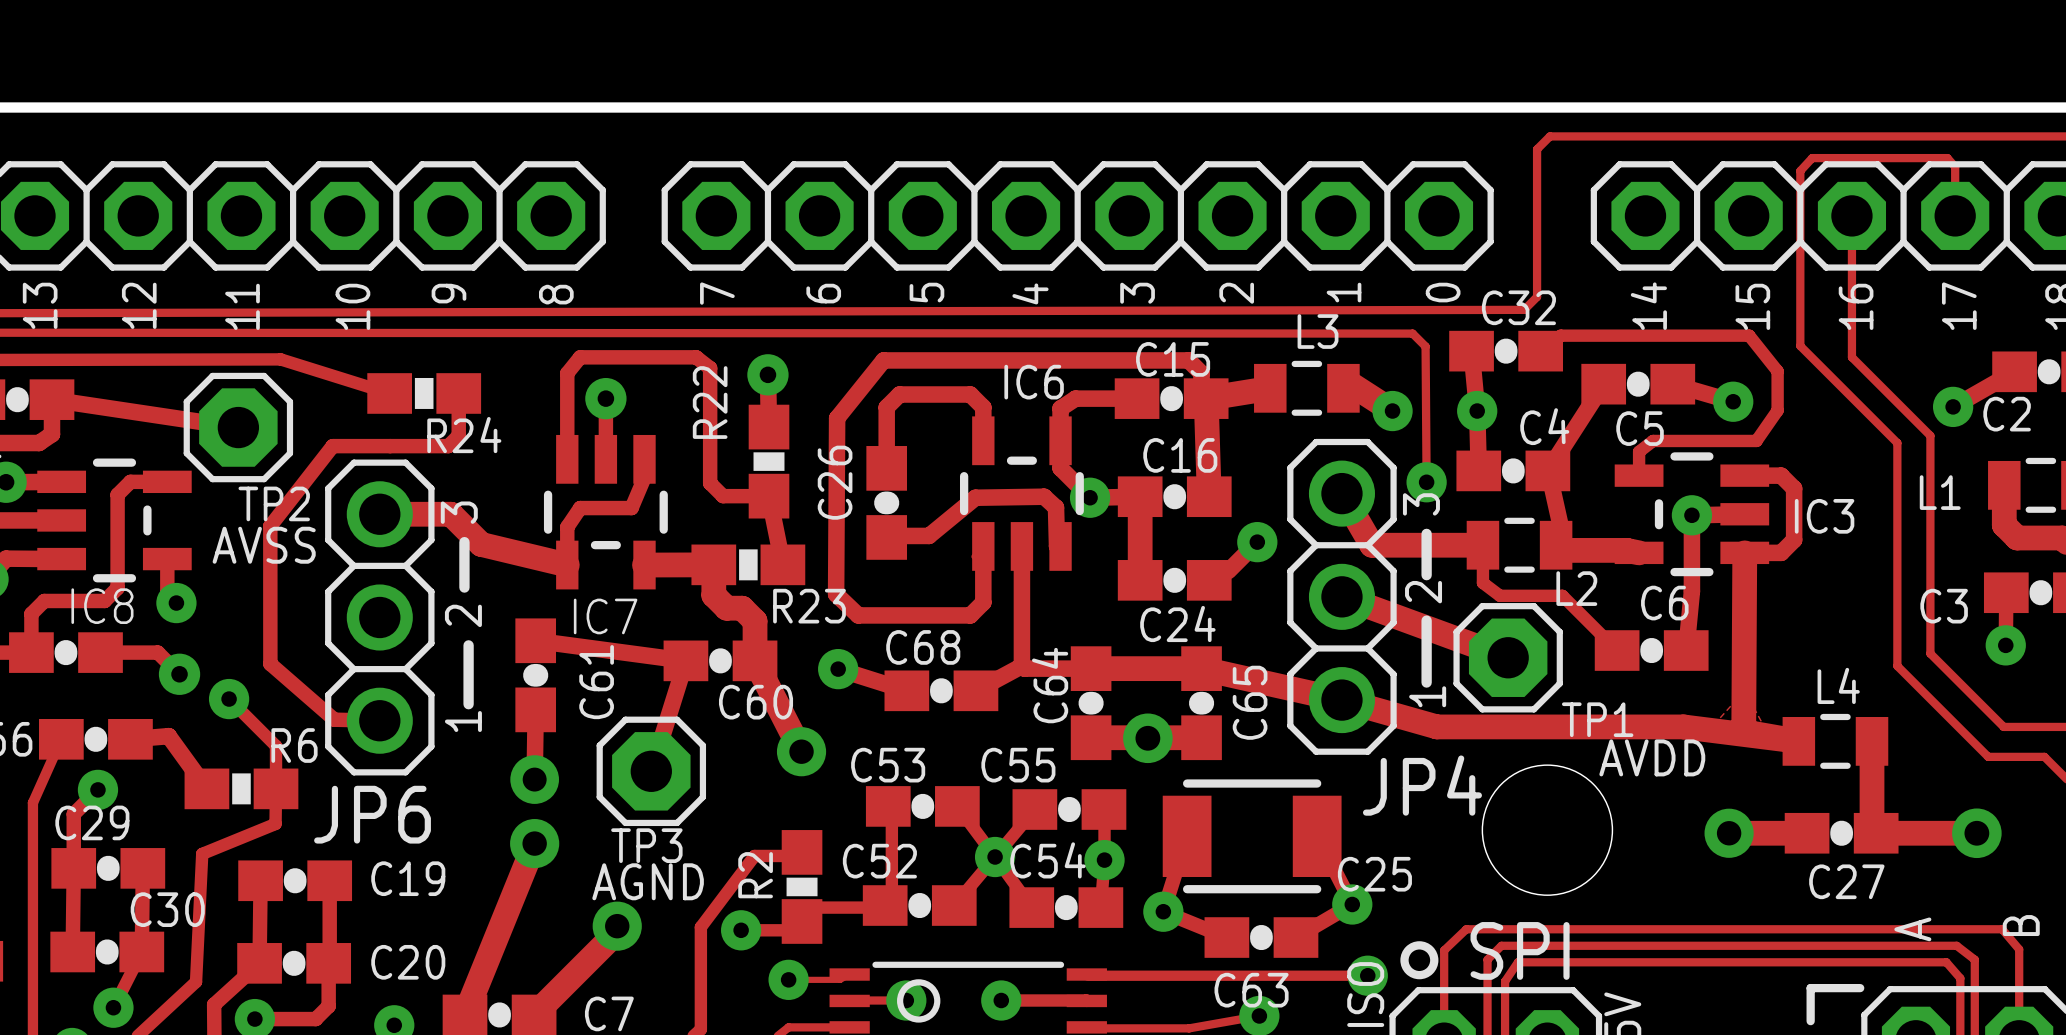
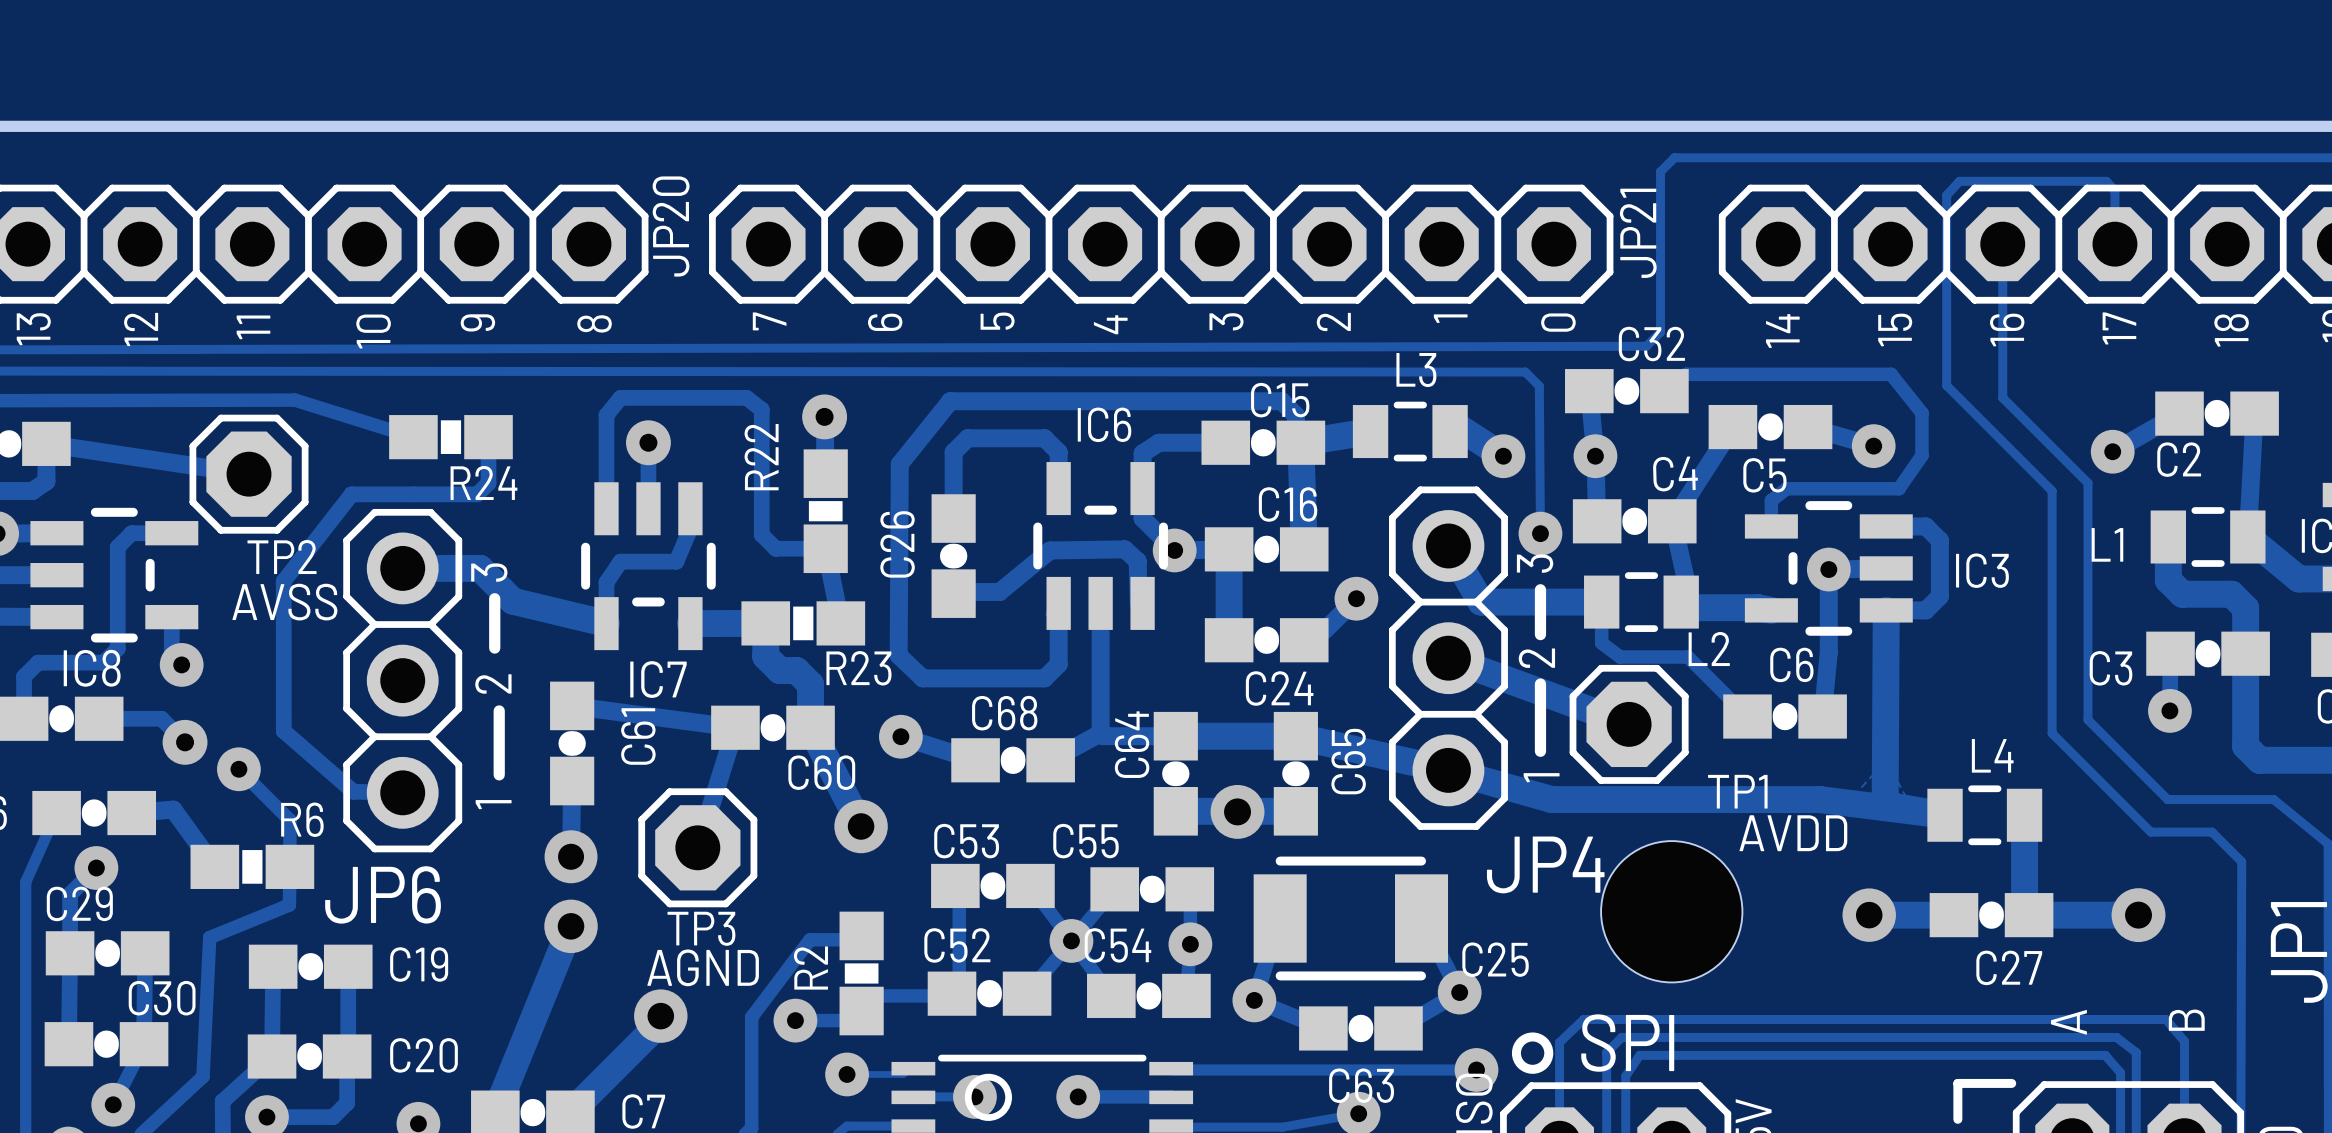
JP20 name: none -> JP20 (671, 226)
JP21 name: none -> JP21 (1638, 233)

